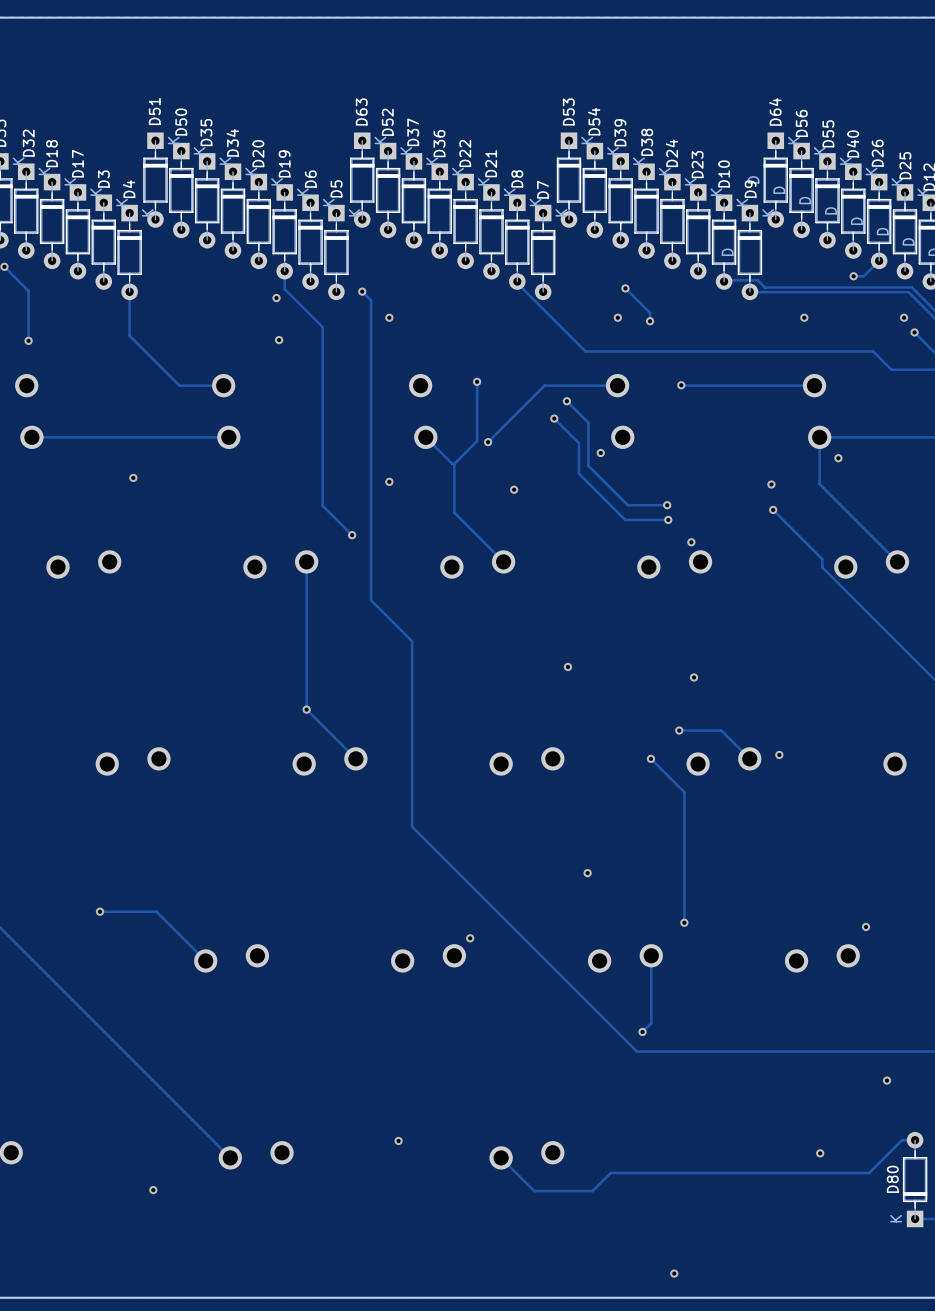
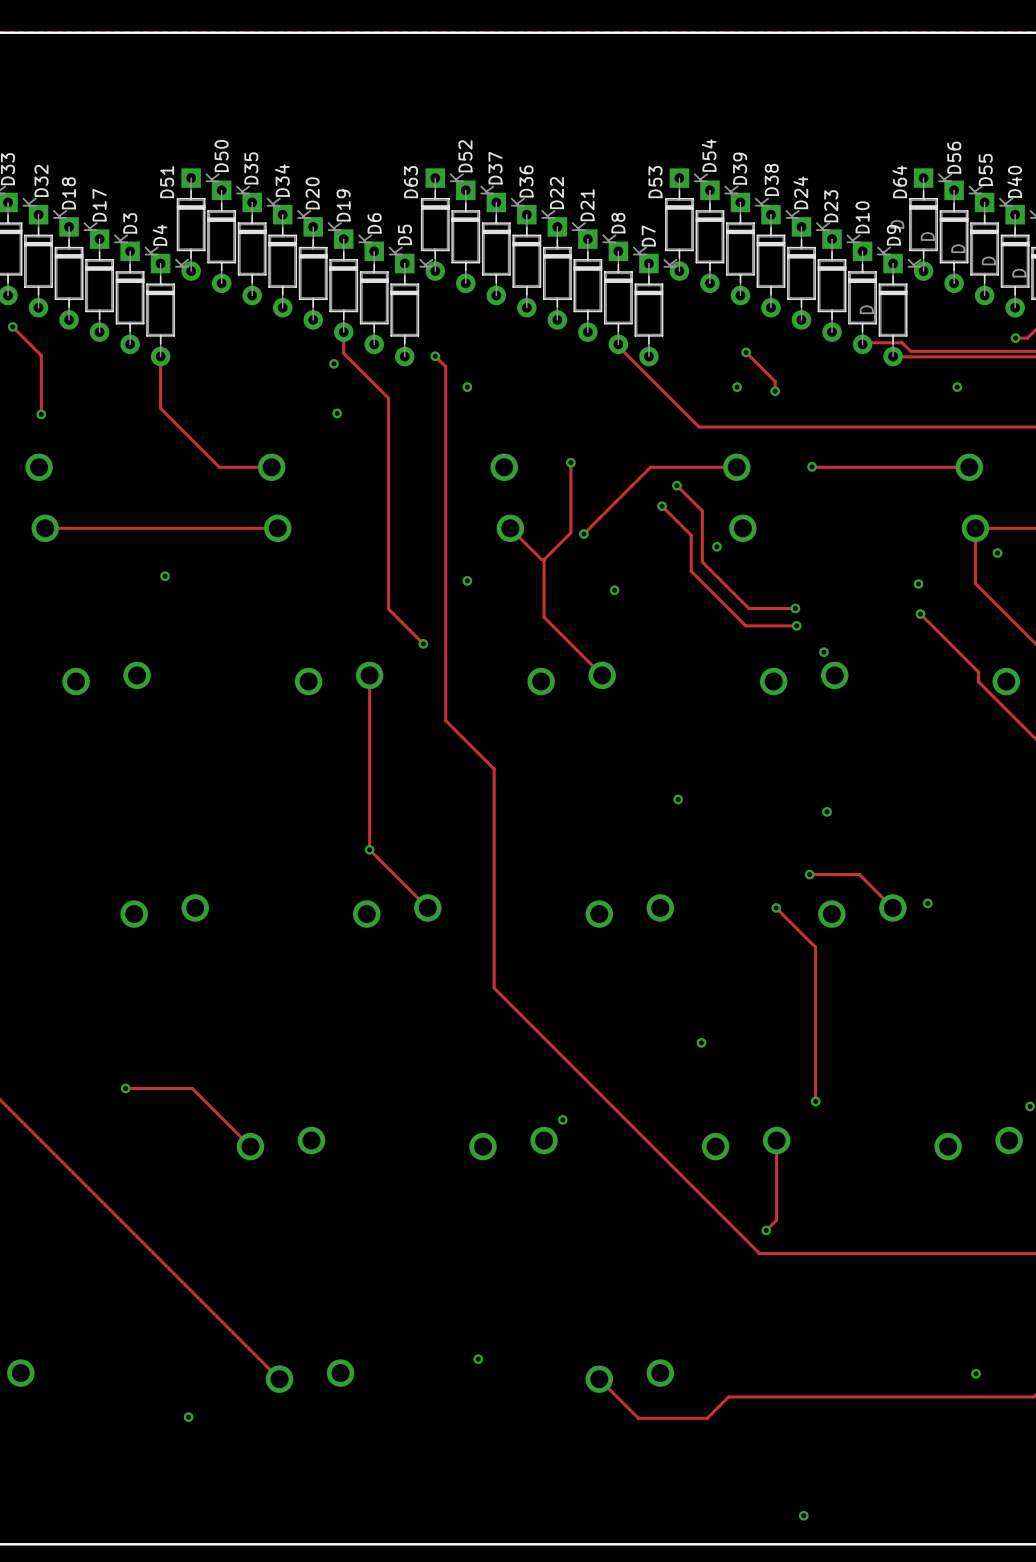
D51 name position: D51 (154, 111) -> D51 (167, 182)
D53 name position: D53 (568, 111) -> D53 (655, 182)
D64 name position: D64 (775, 111) -> D64 (899, 181)
D63 name position: D63 (361, 112) -> D63 (411, 182)

